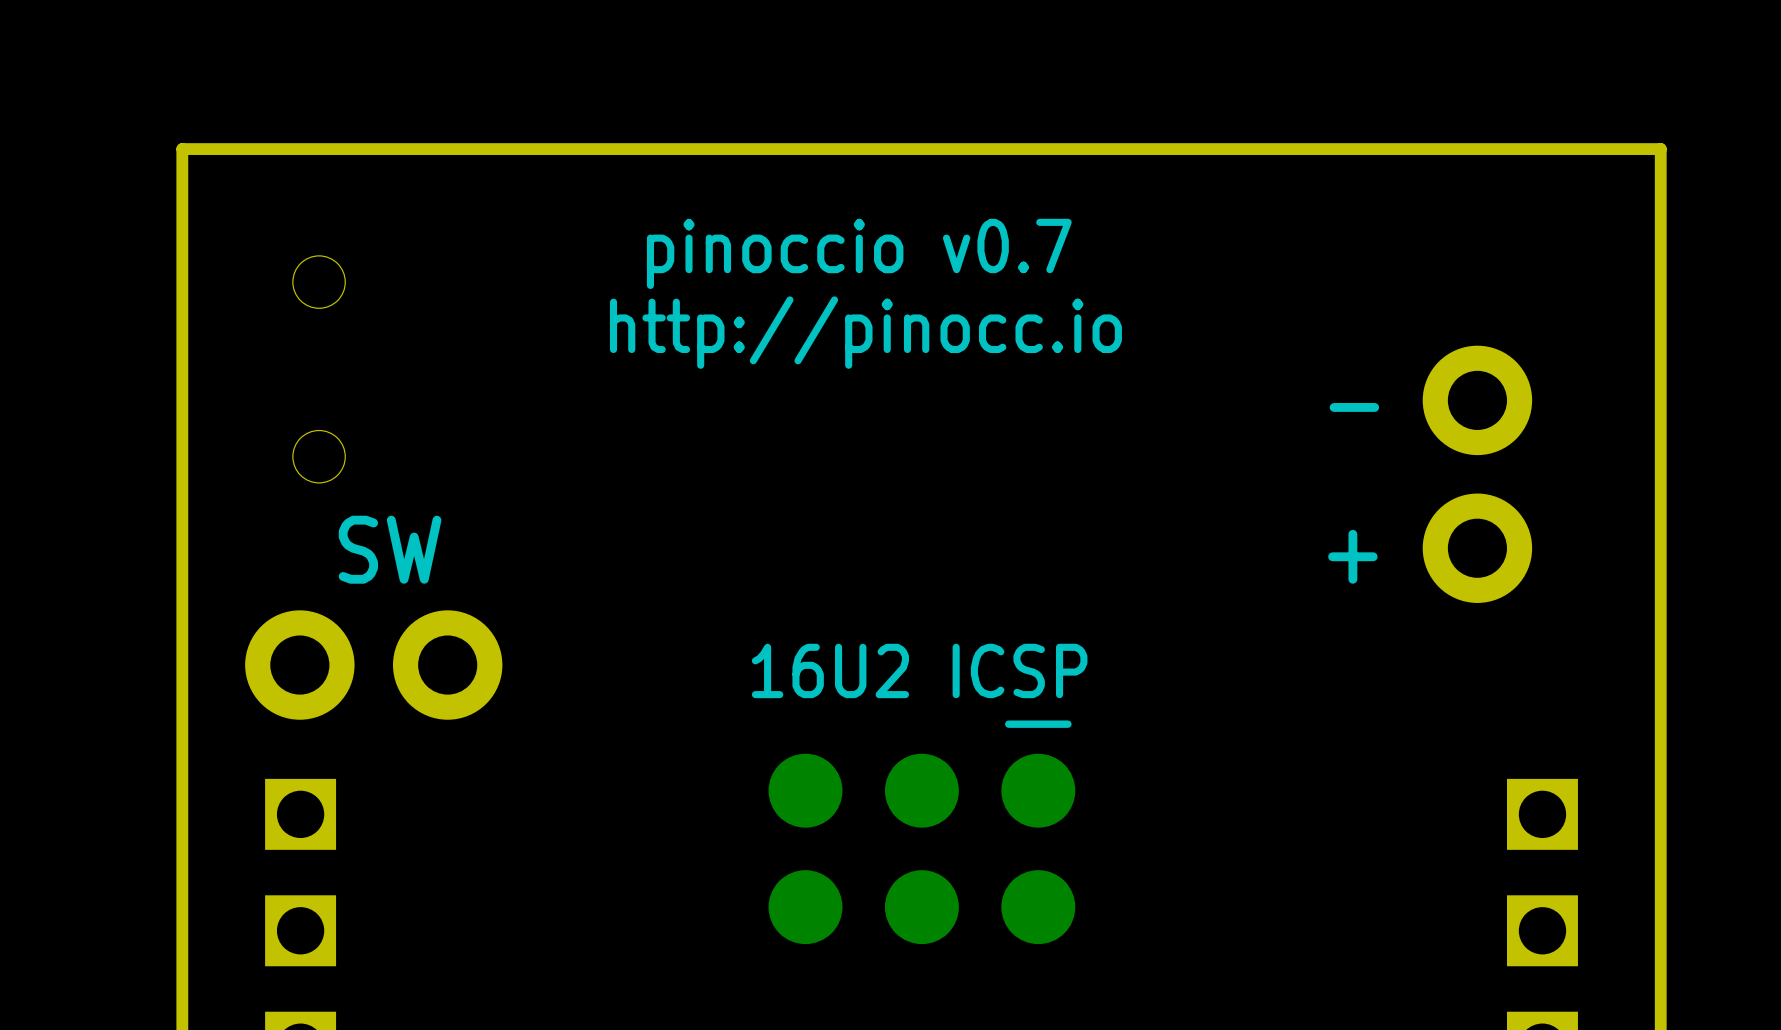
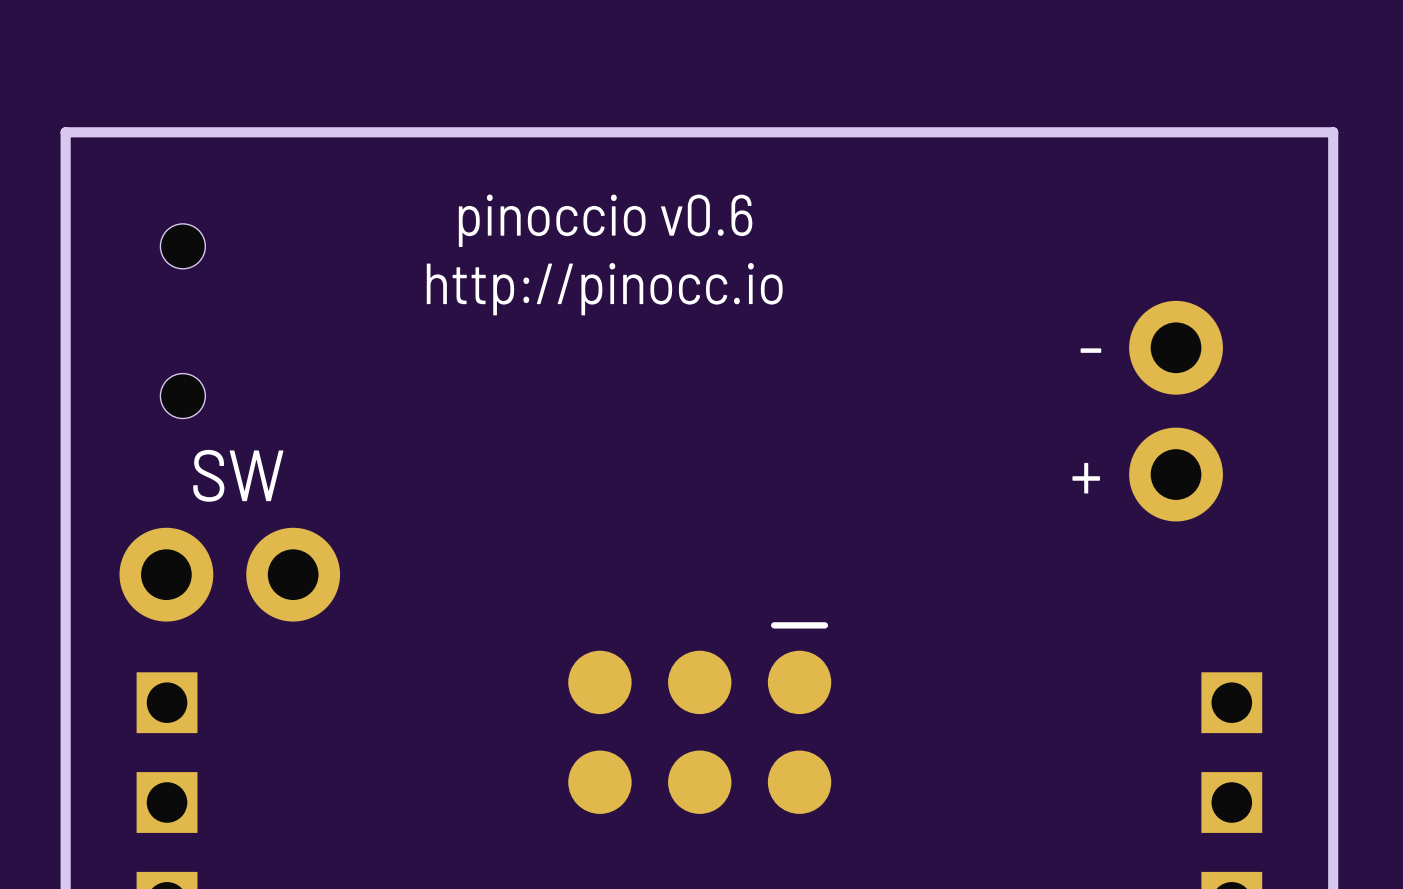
text: pinoccio v0.7 (859, 253) -> pinoccio v0.6 (605, 220)
text: 16U2 ICSP (919, 670) -> none

